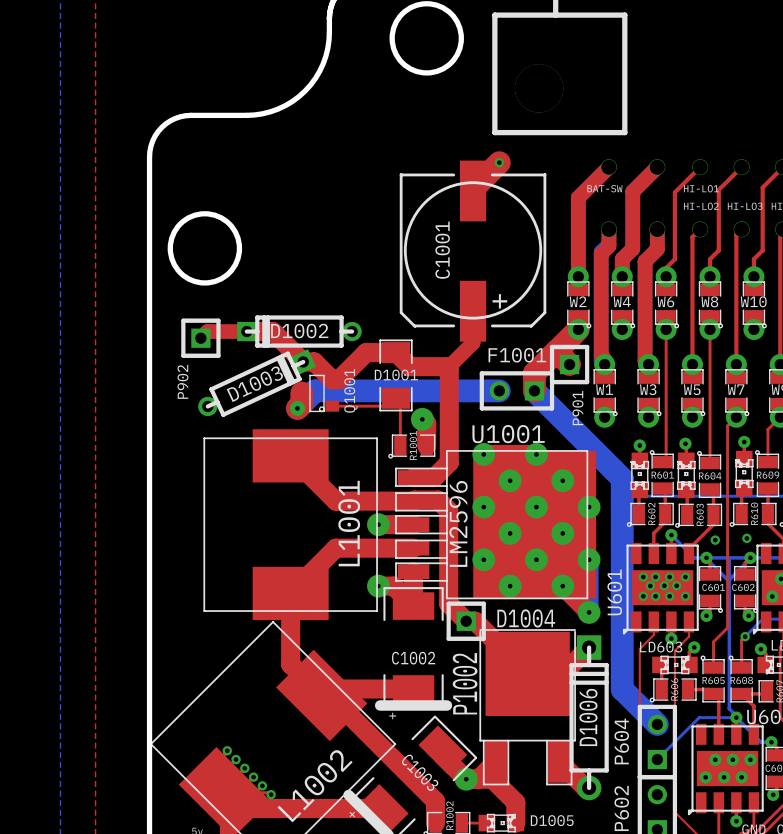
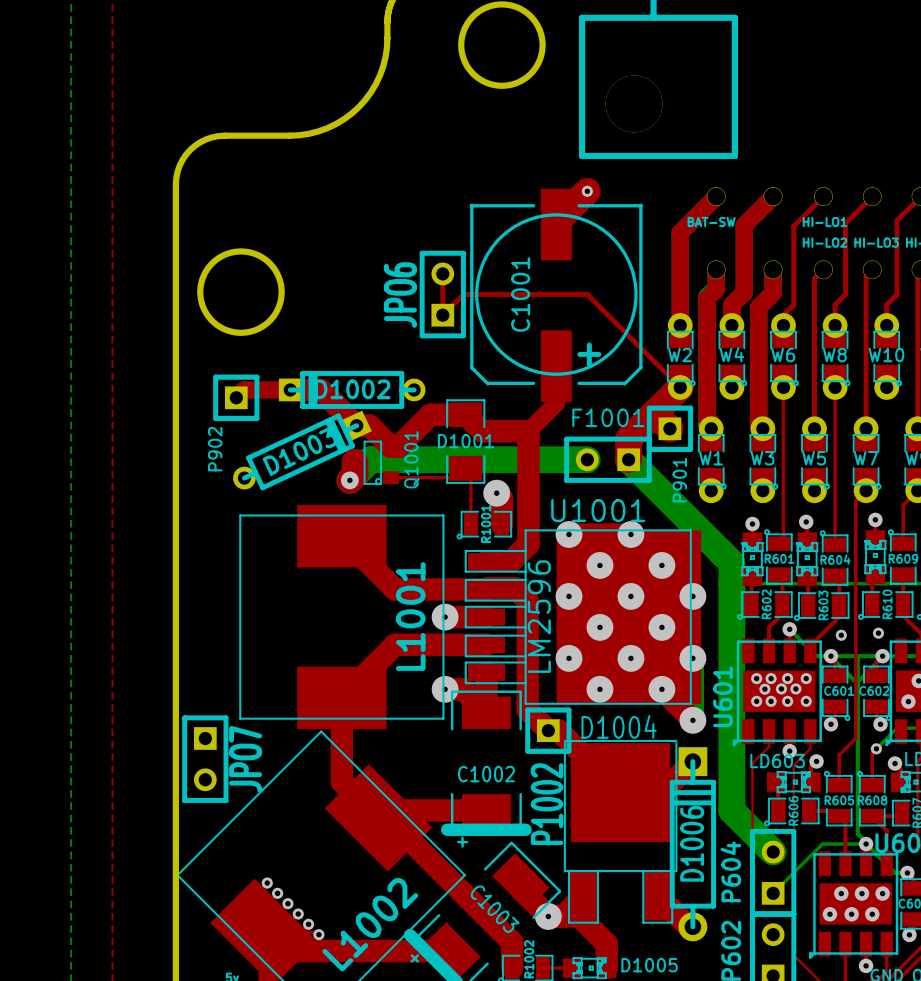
top track: none -> (442, 273) (442, 315) (463, 294) (587, 294) (680, 387)
JPO6: none -> (442, 294)
JPO7: none -> (205, 759)

